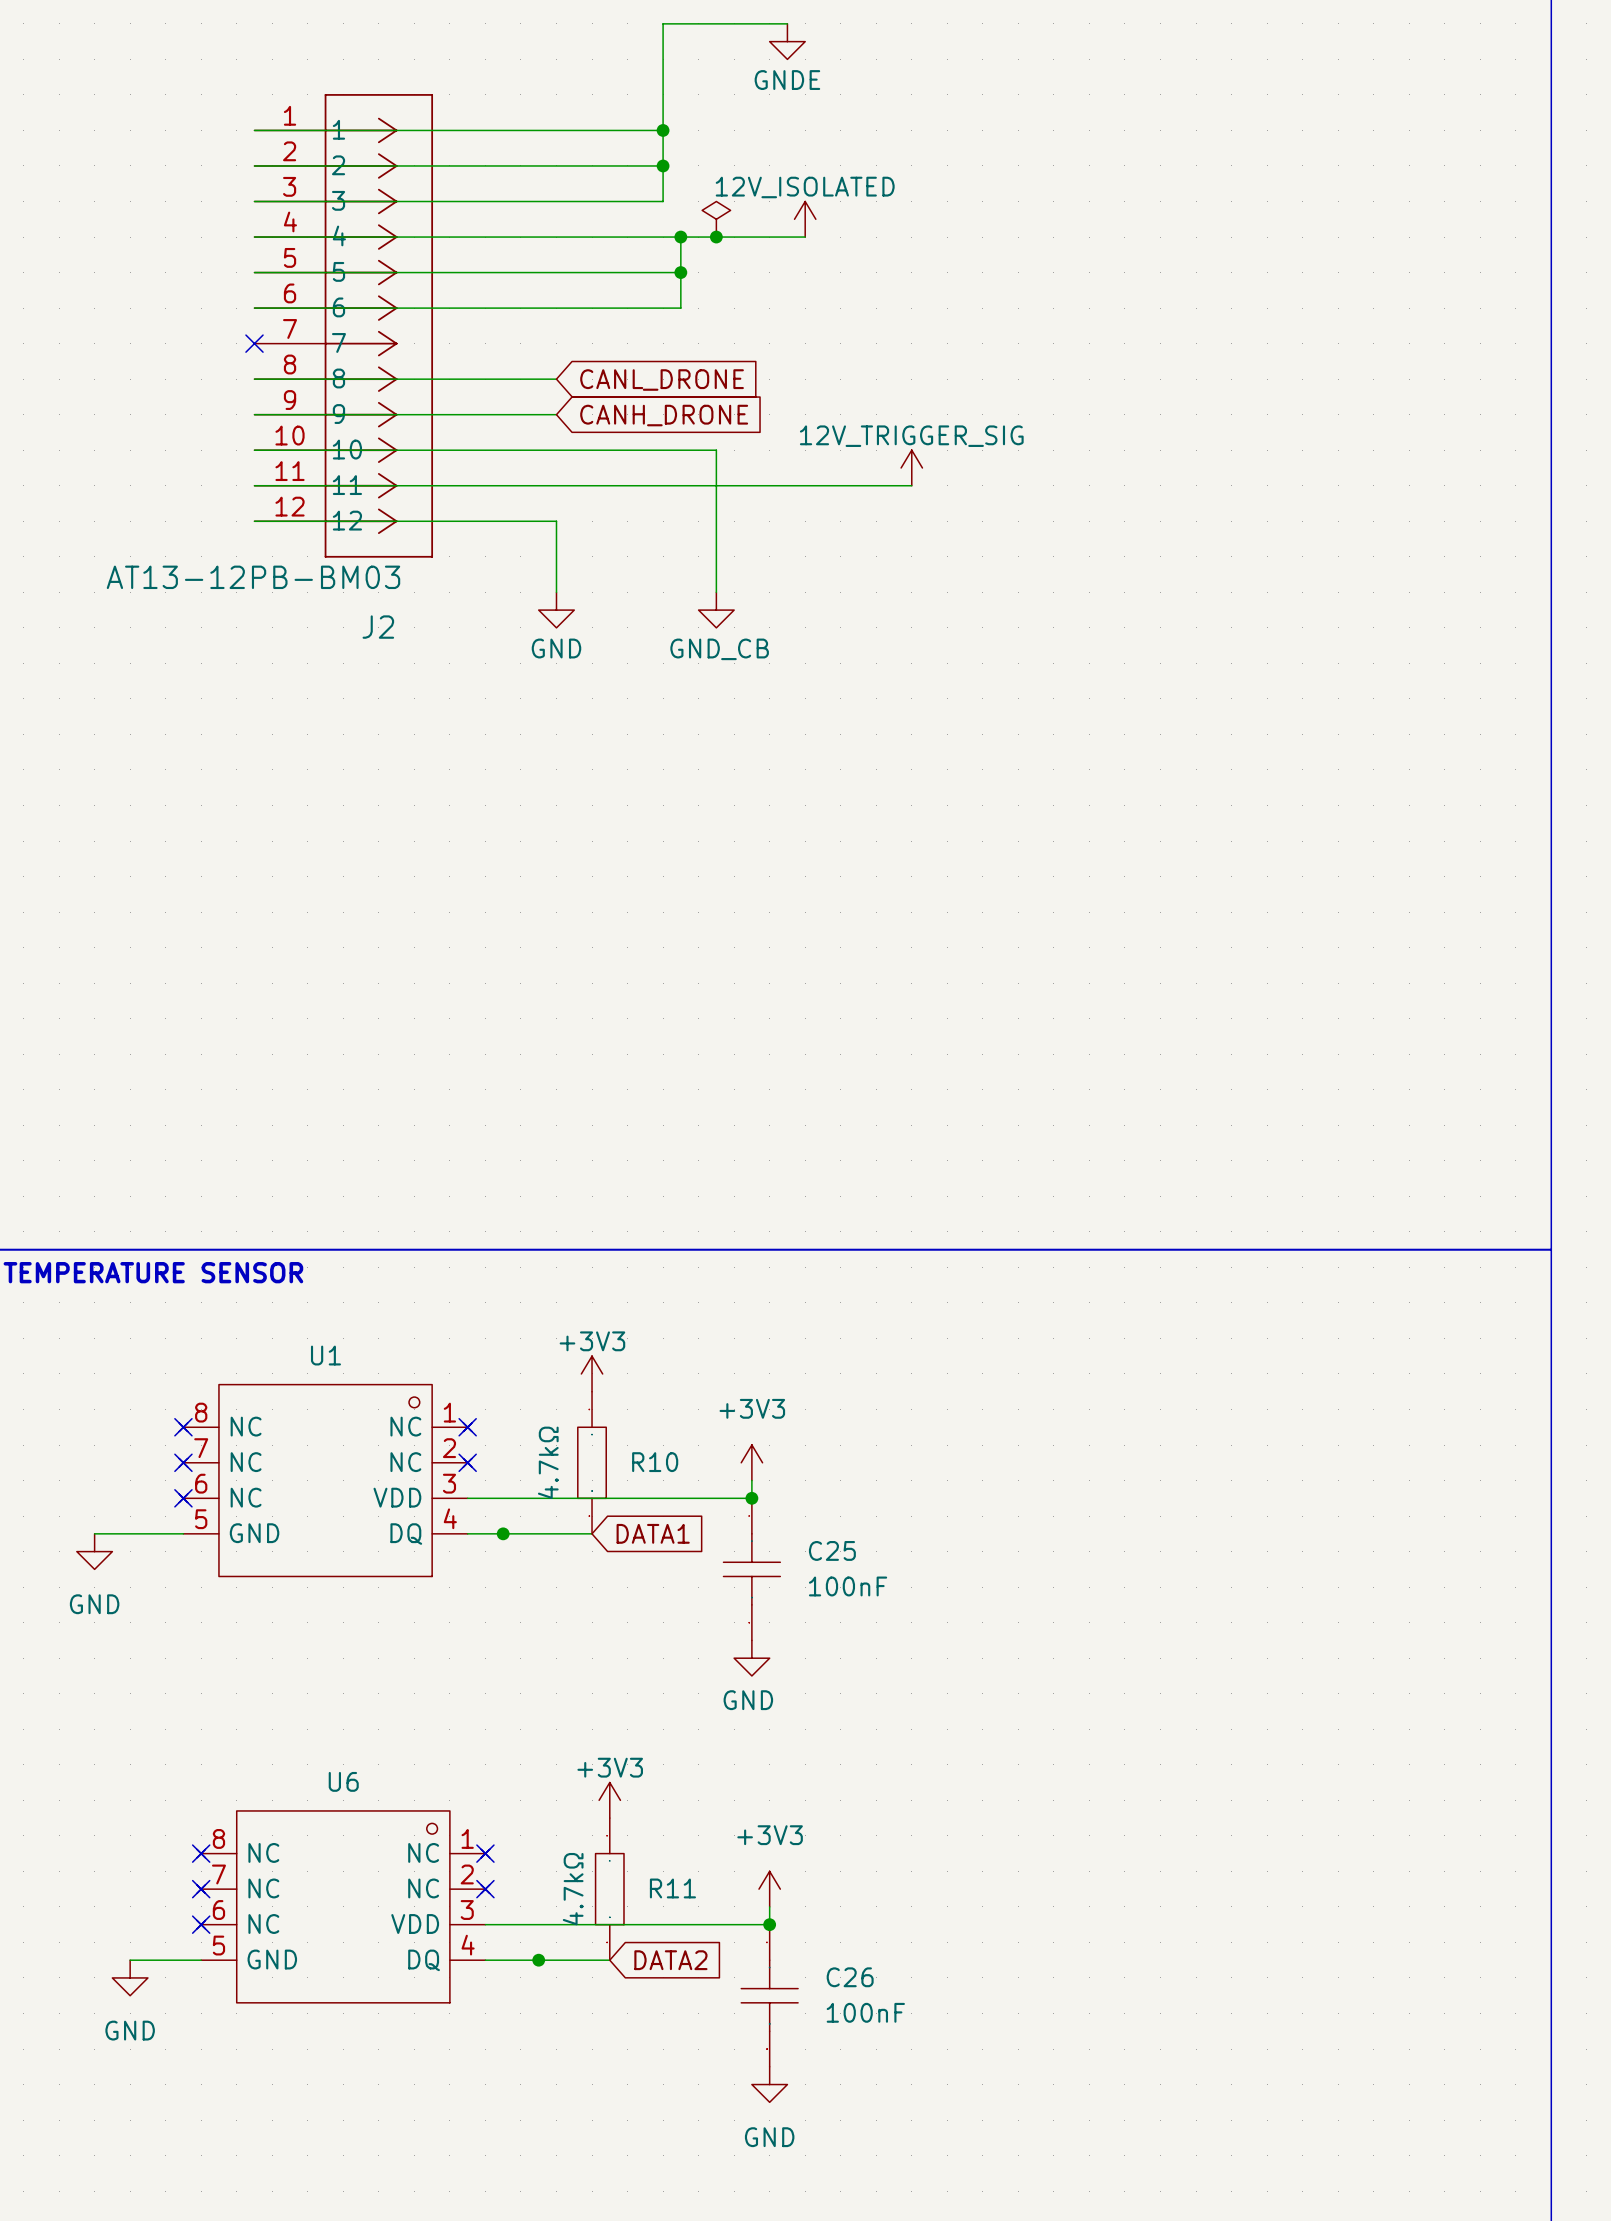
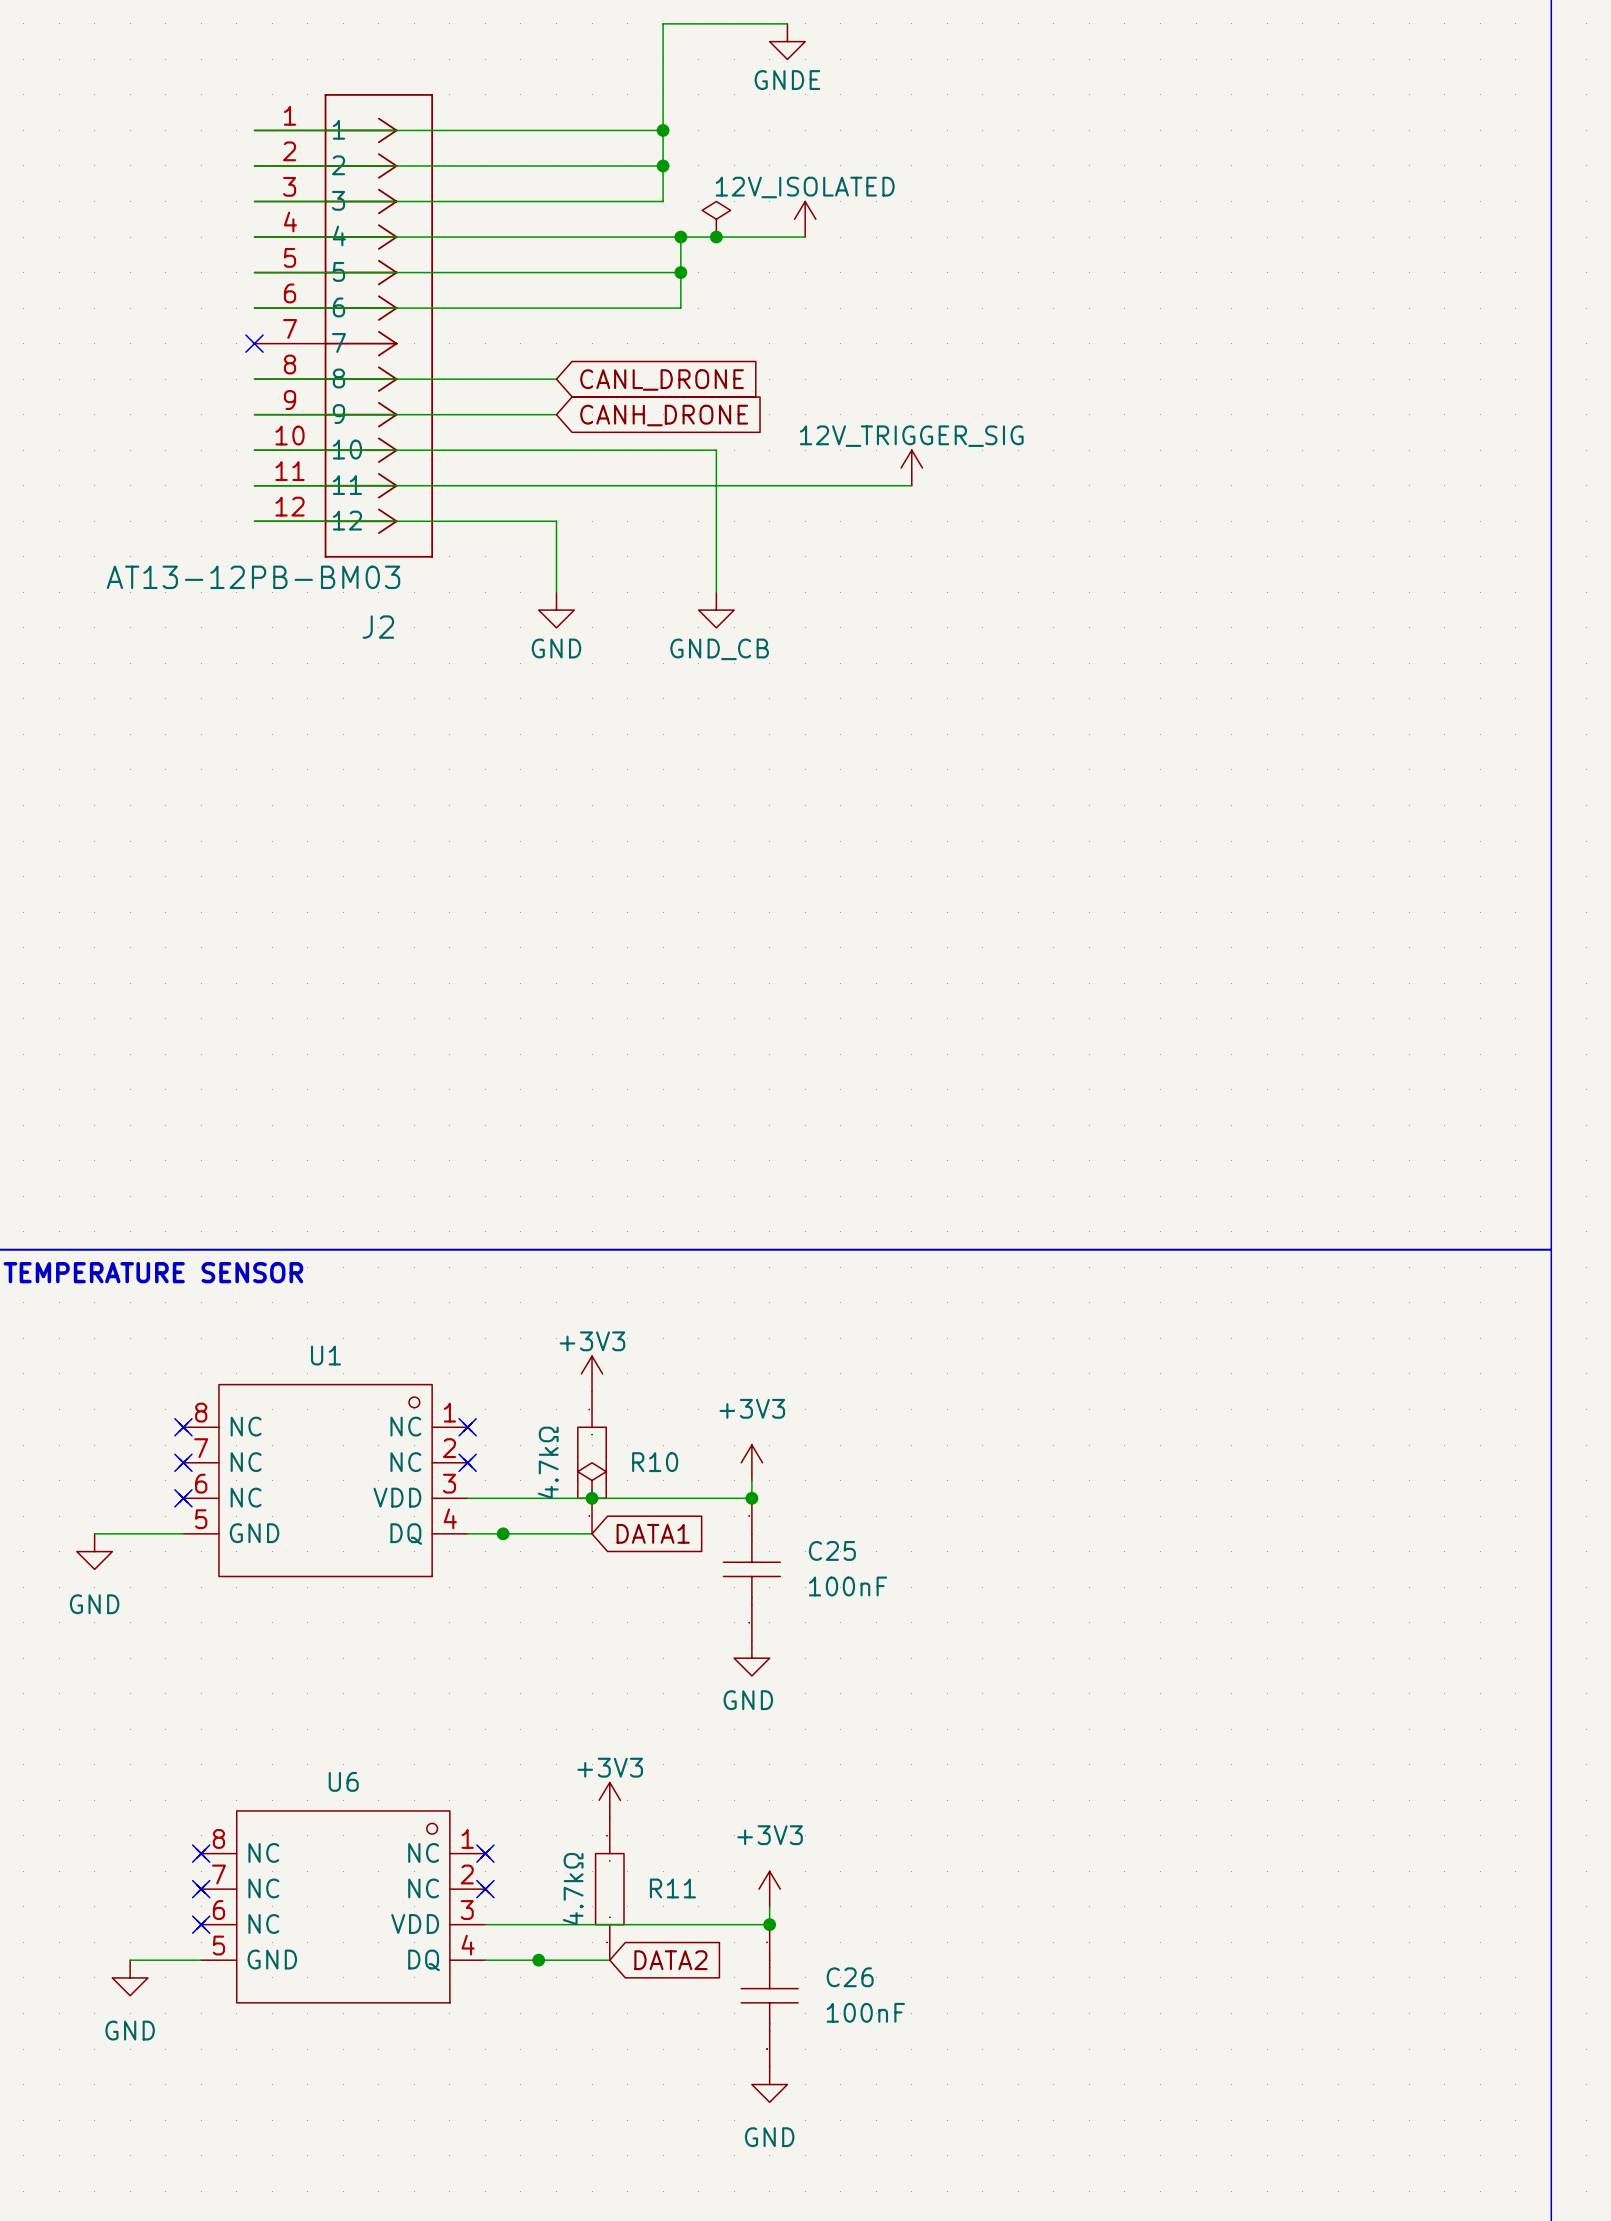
power symbol: none -> (592, 1480)
junction: none -> (592, 1498)

